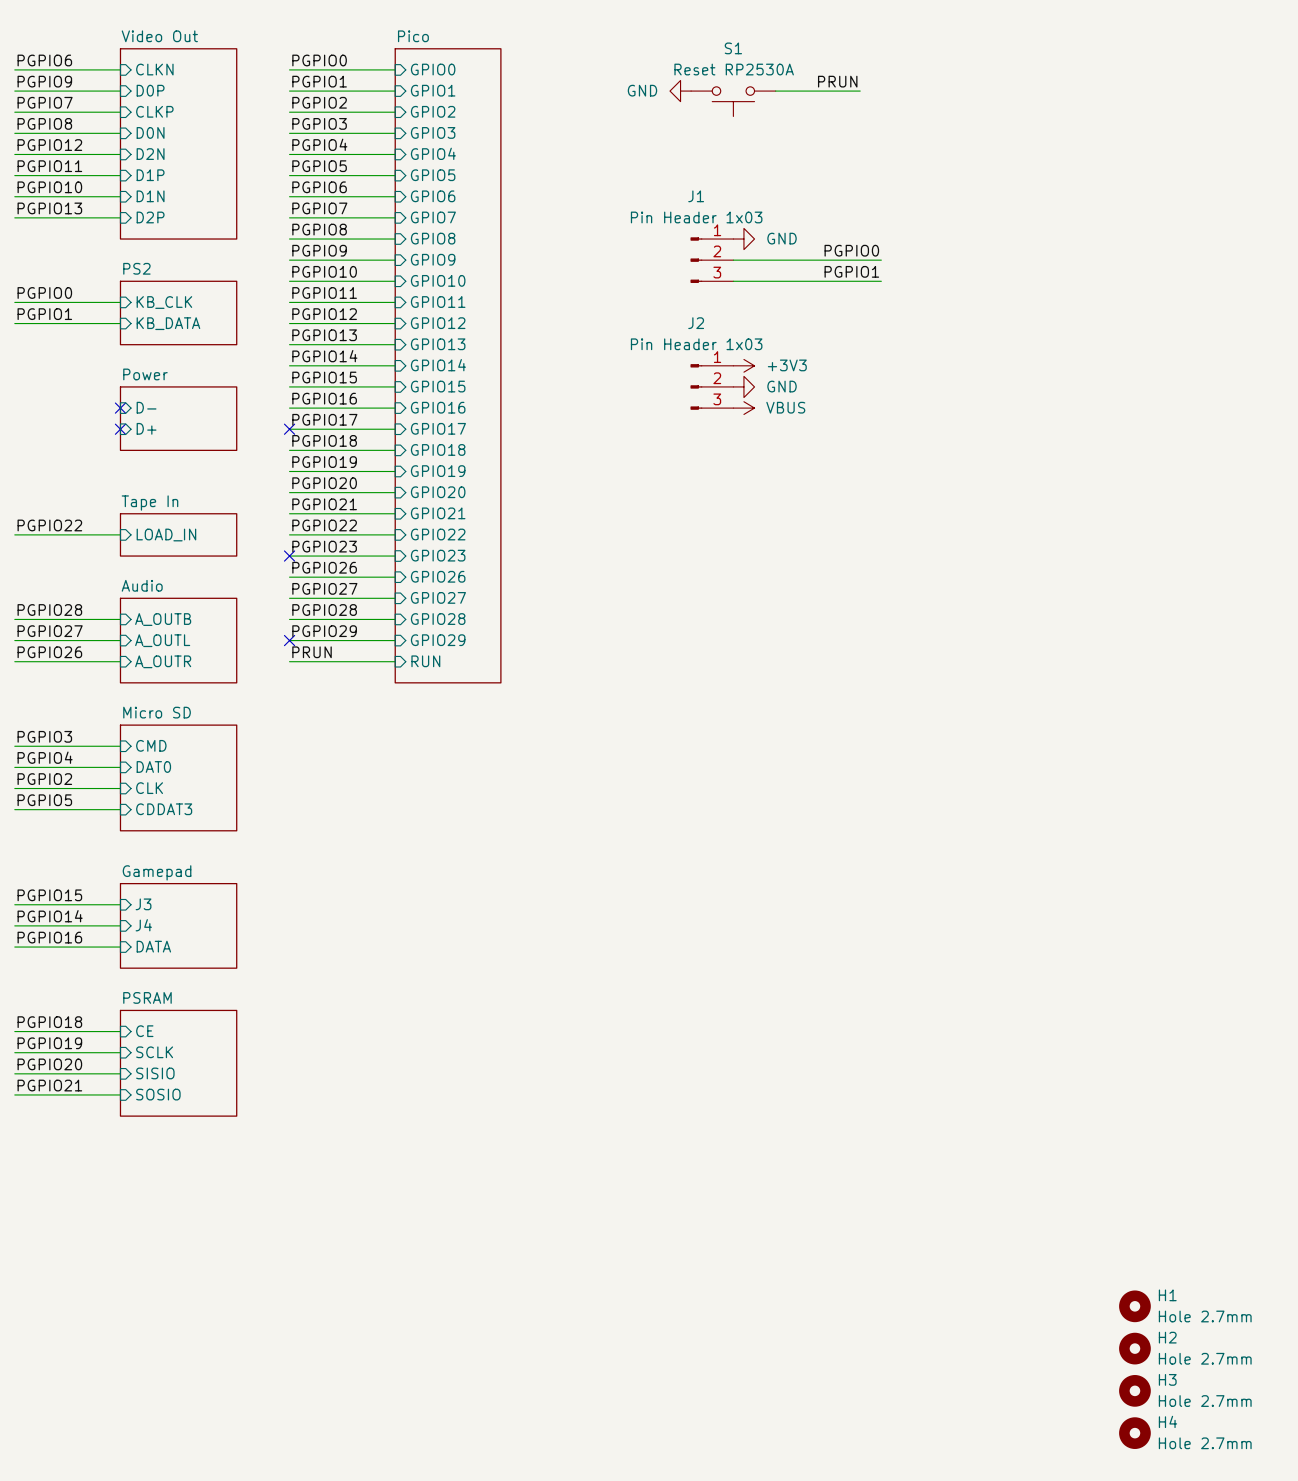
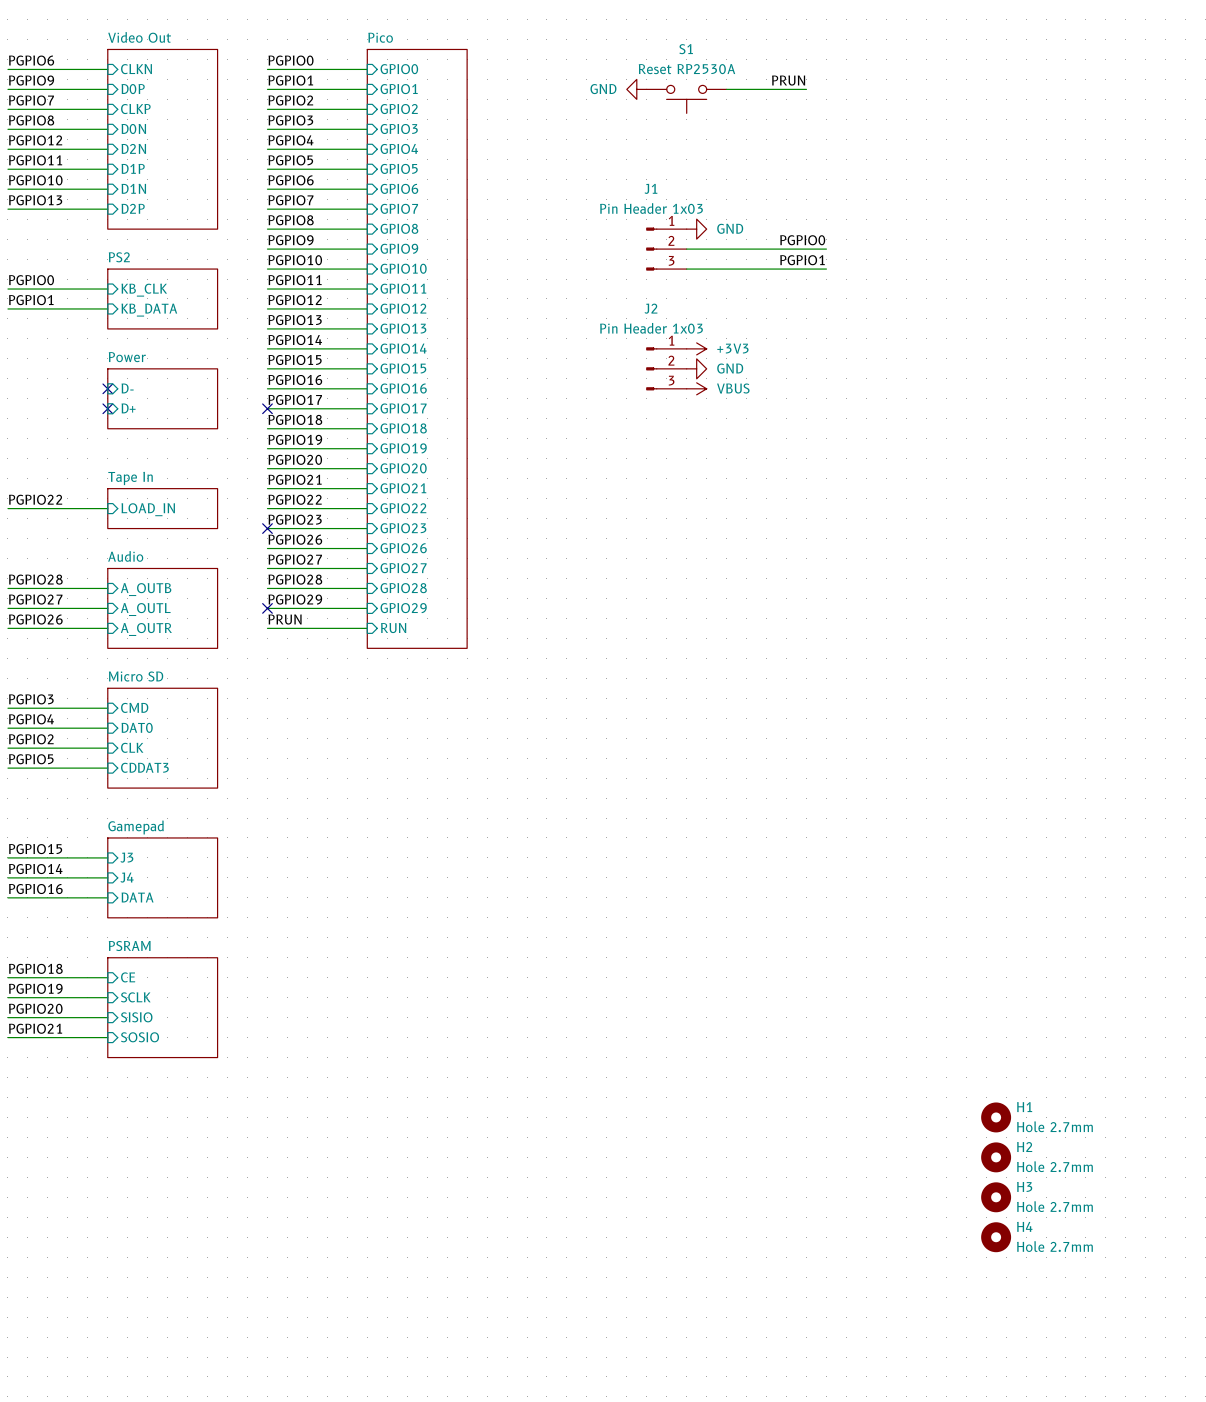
H1 position: (1134, 1306) -> (996, 1117)
H2 position: (1134, 1348) -> (996, 1157)
H3 position: (1134, 1390) -> (996, 1197)
H4 position: (1134, 1433) -> (996, 1237)

